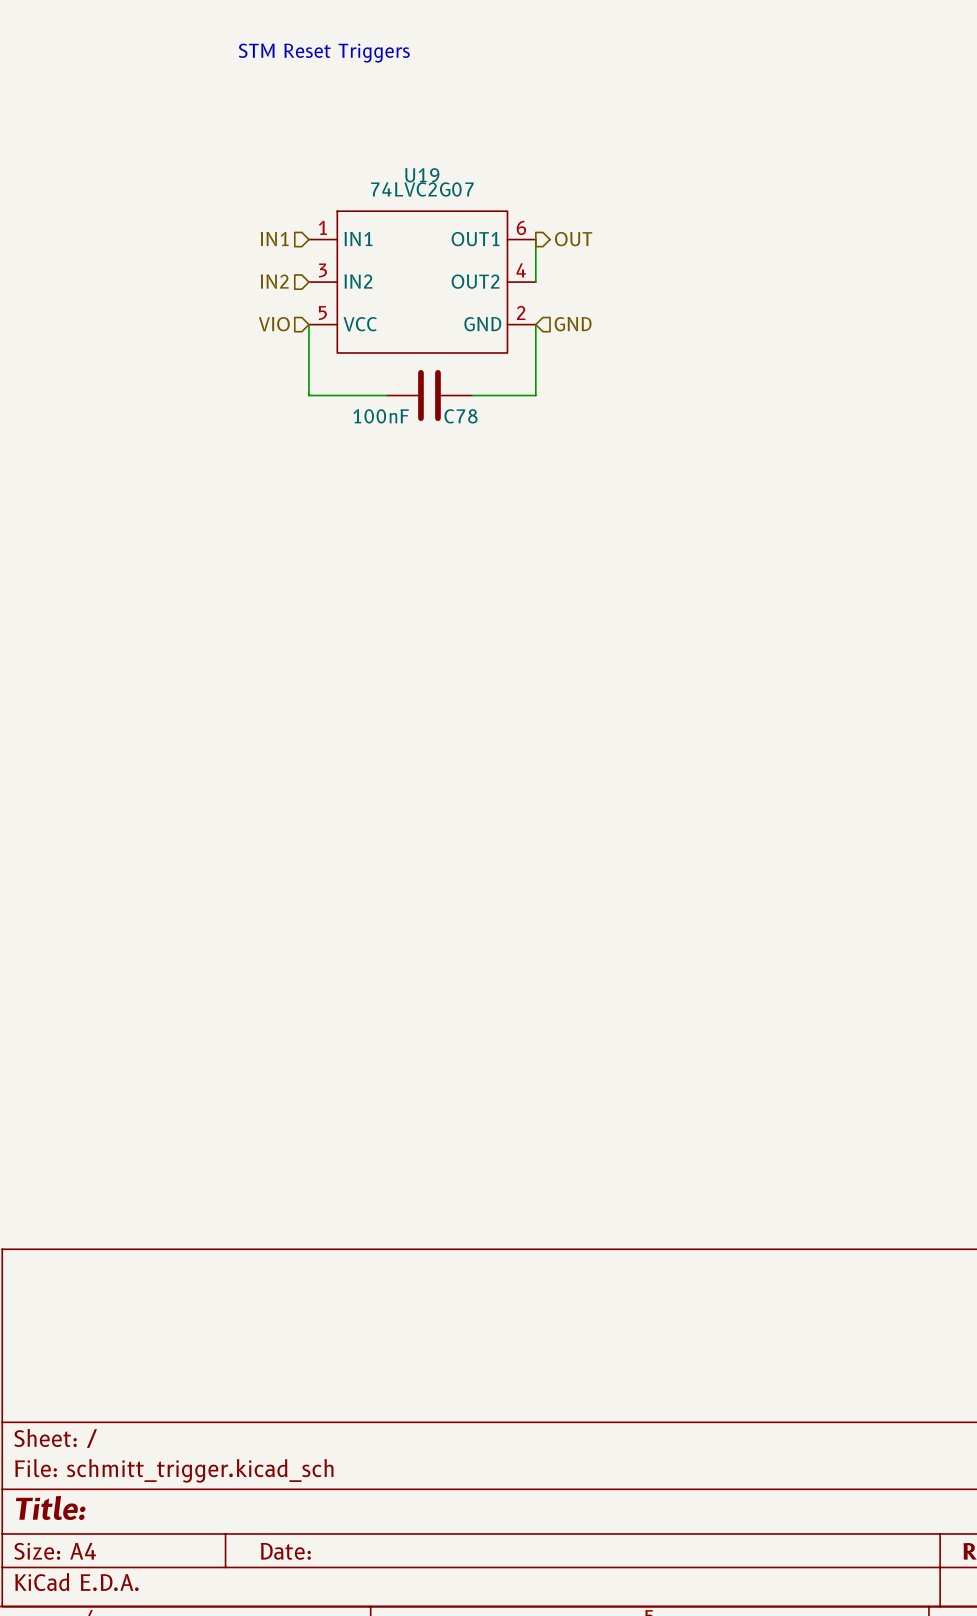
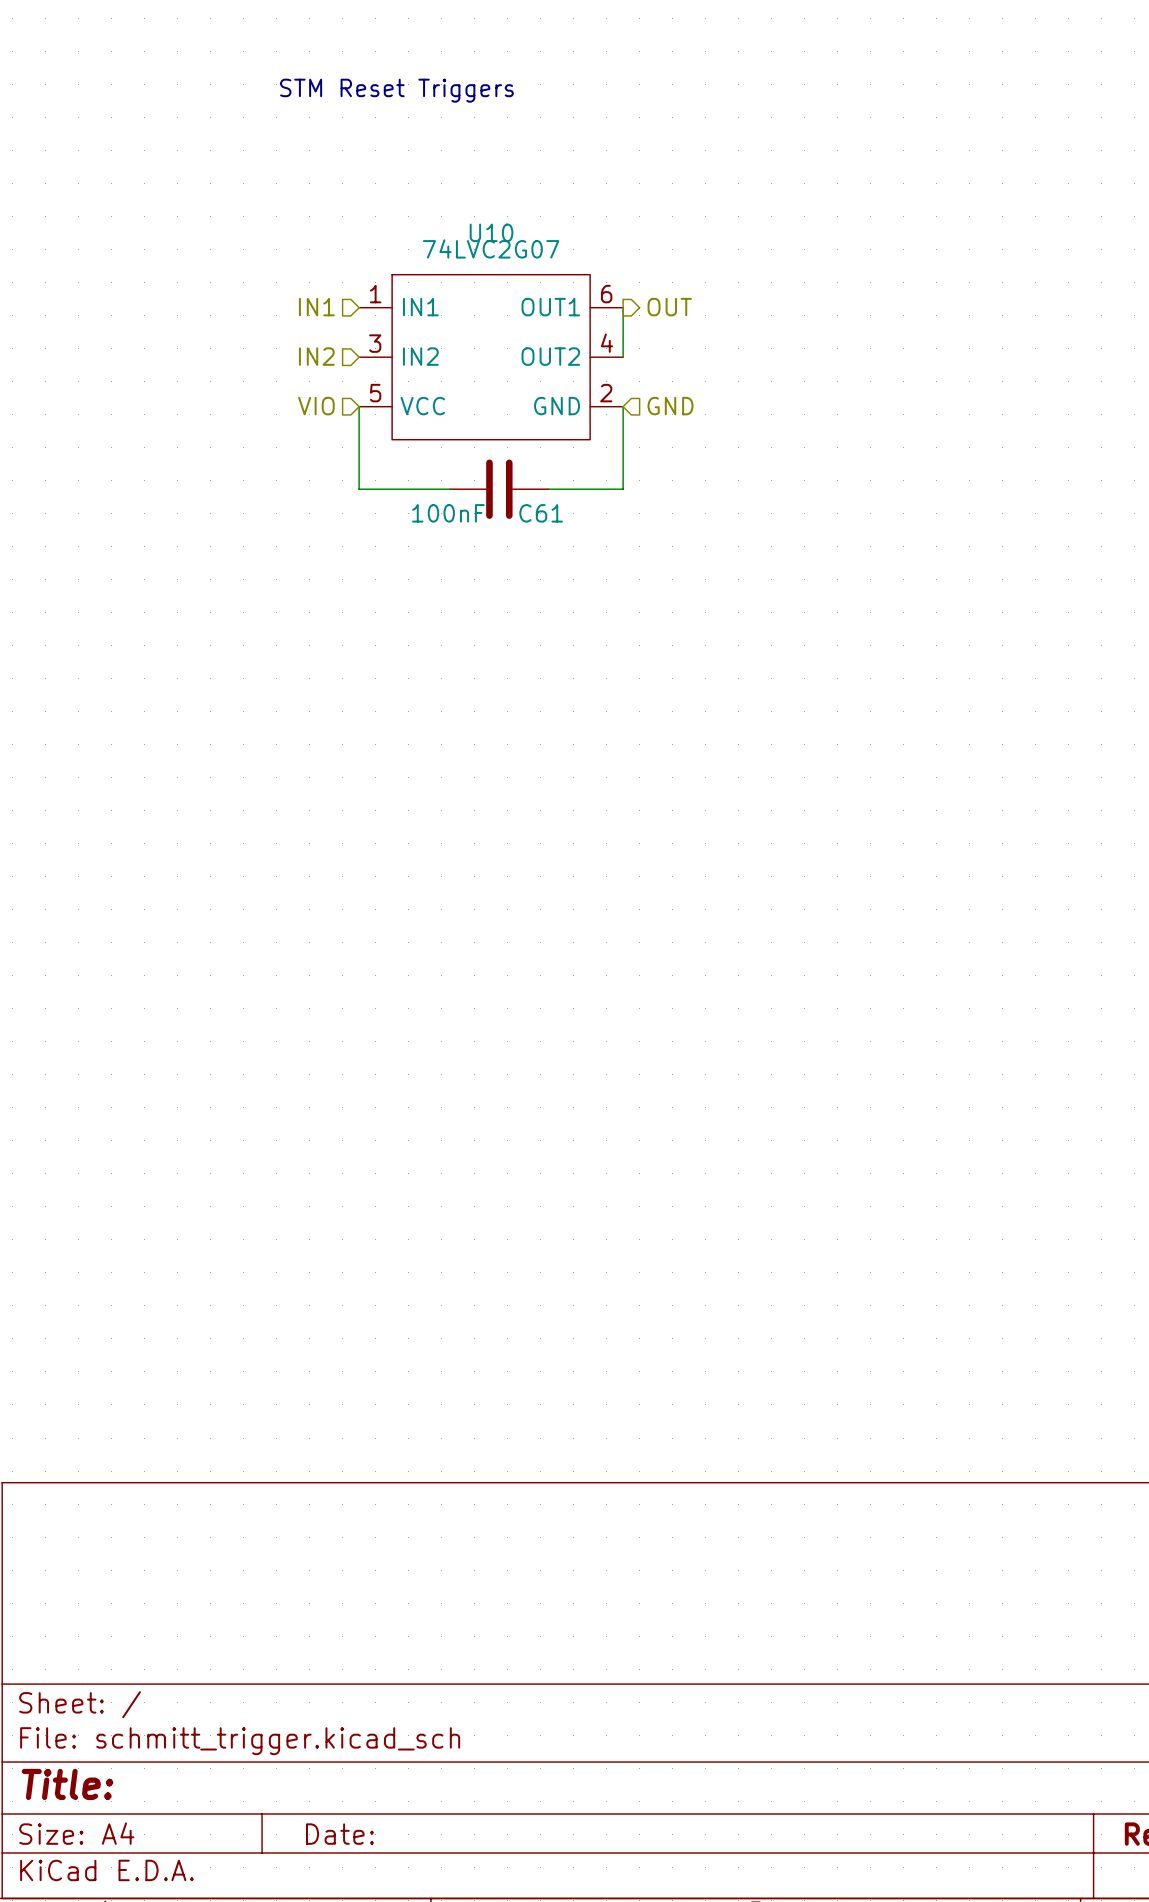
U19 name: U19 (422, 175) -> U10 (491, 232)
C78 name: C78 (461, 416) -> C61 (541, 513)

